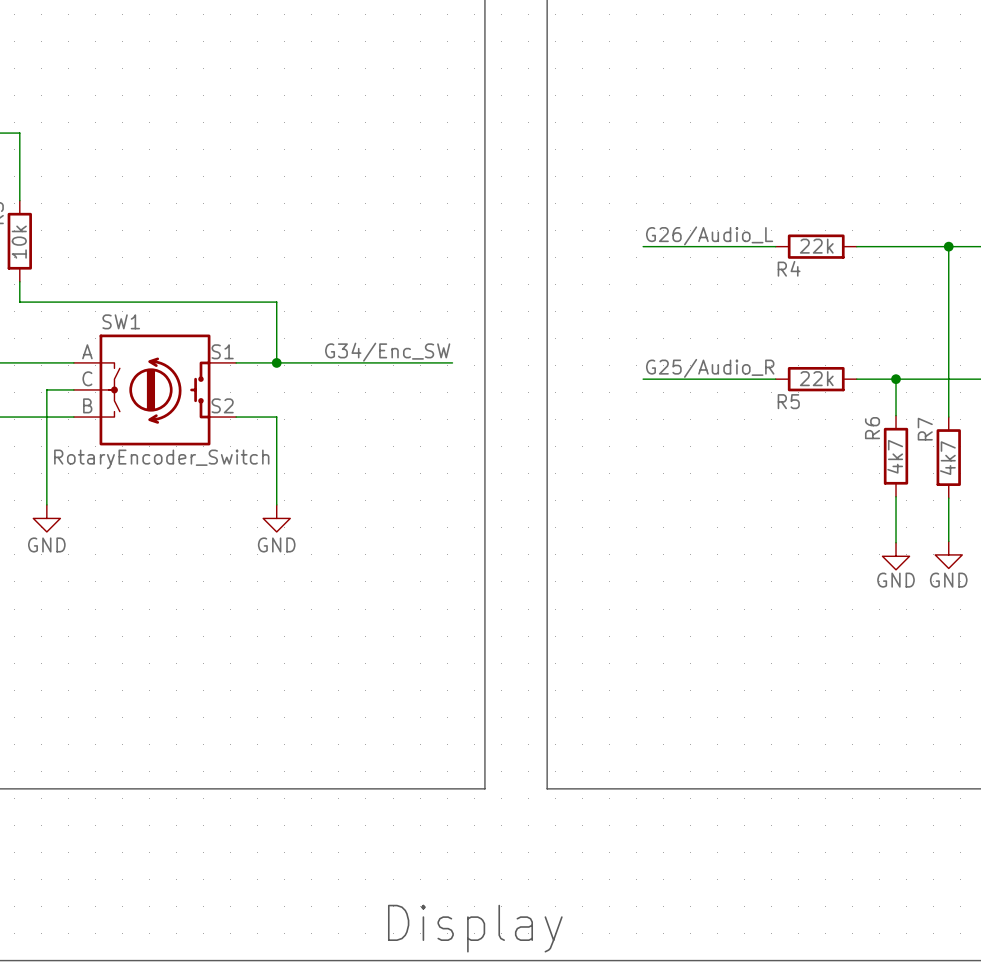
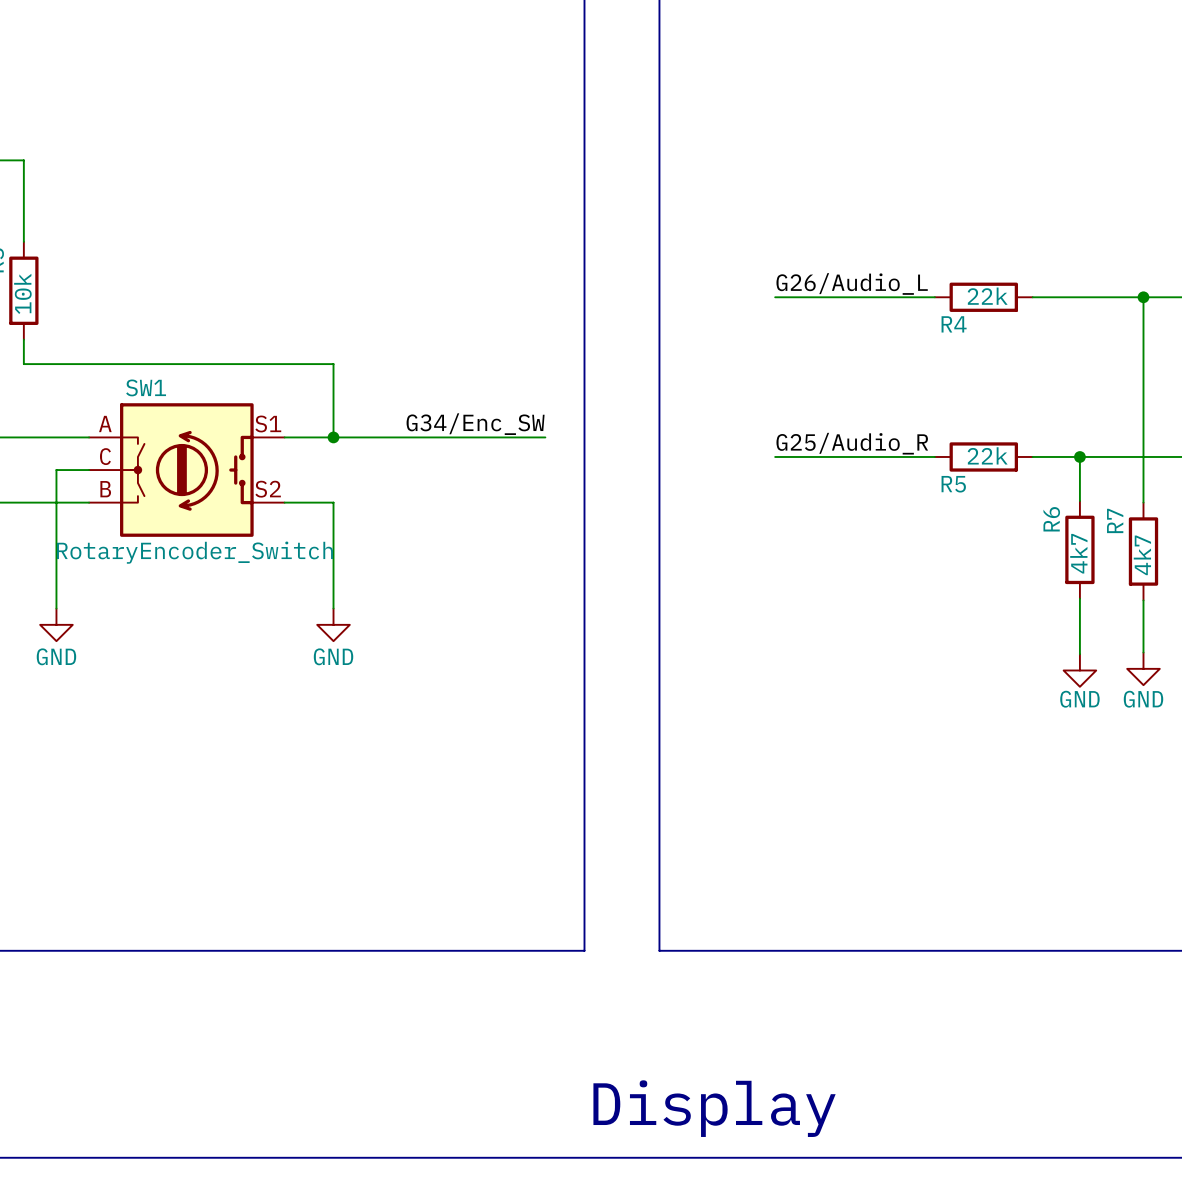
text position: Display (475, 928) -> Display (714, 1108)

